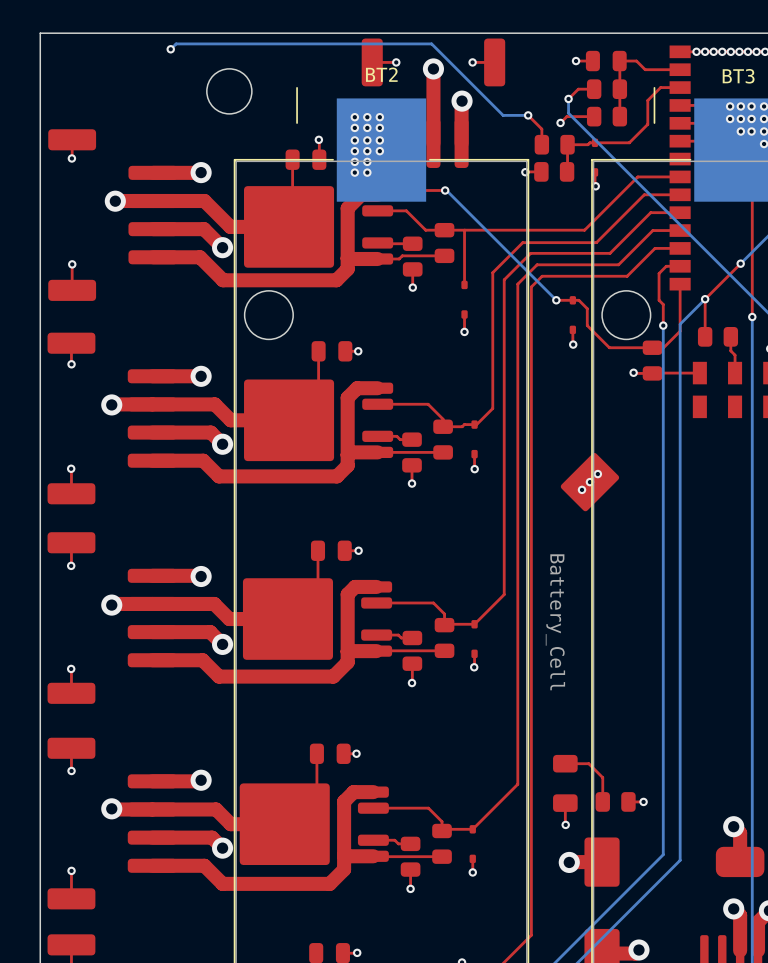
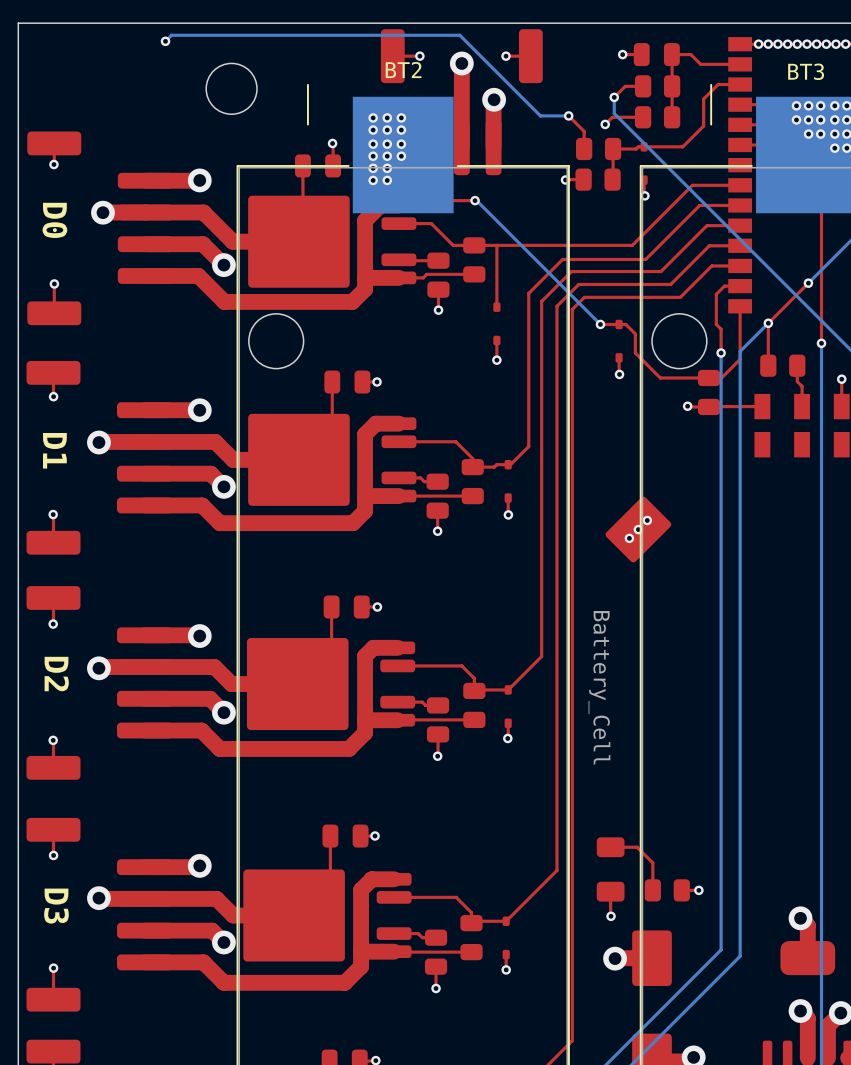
text: none -> D0 (54, 220)
text: none -> D1 (54, 450)
text: none -> D2 (56, 674)
text: none -> D3 (56, 906)

